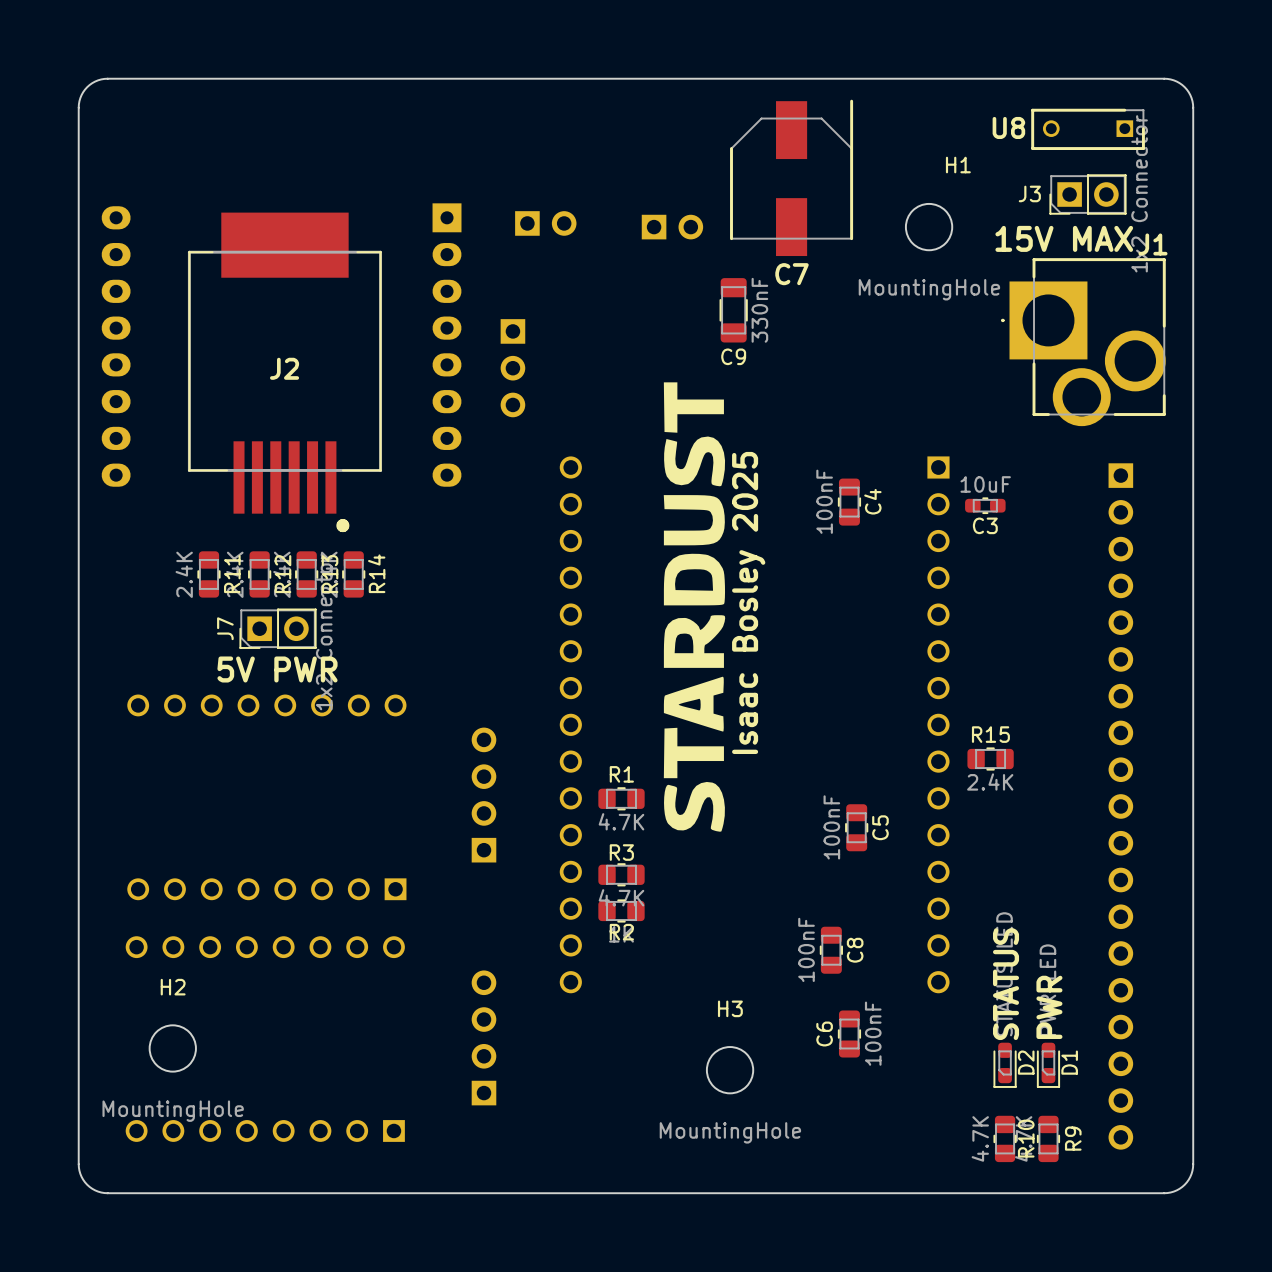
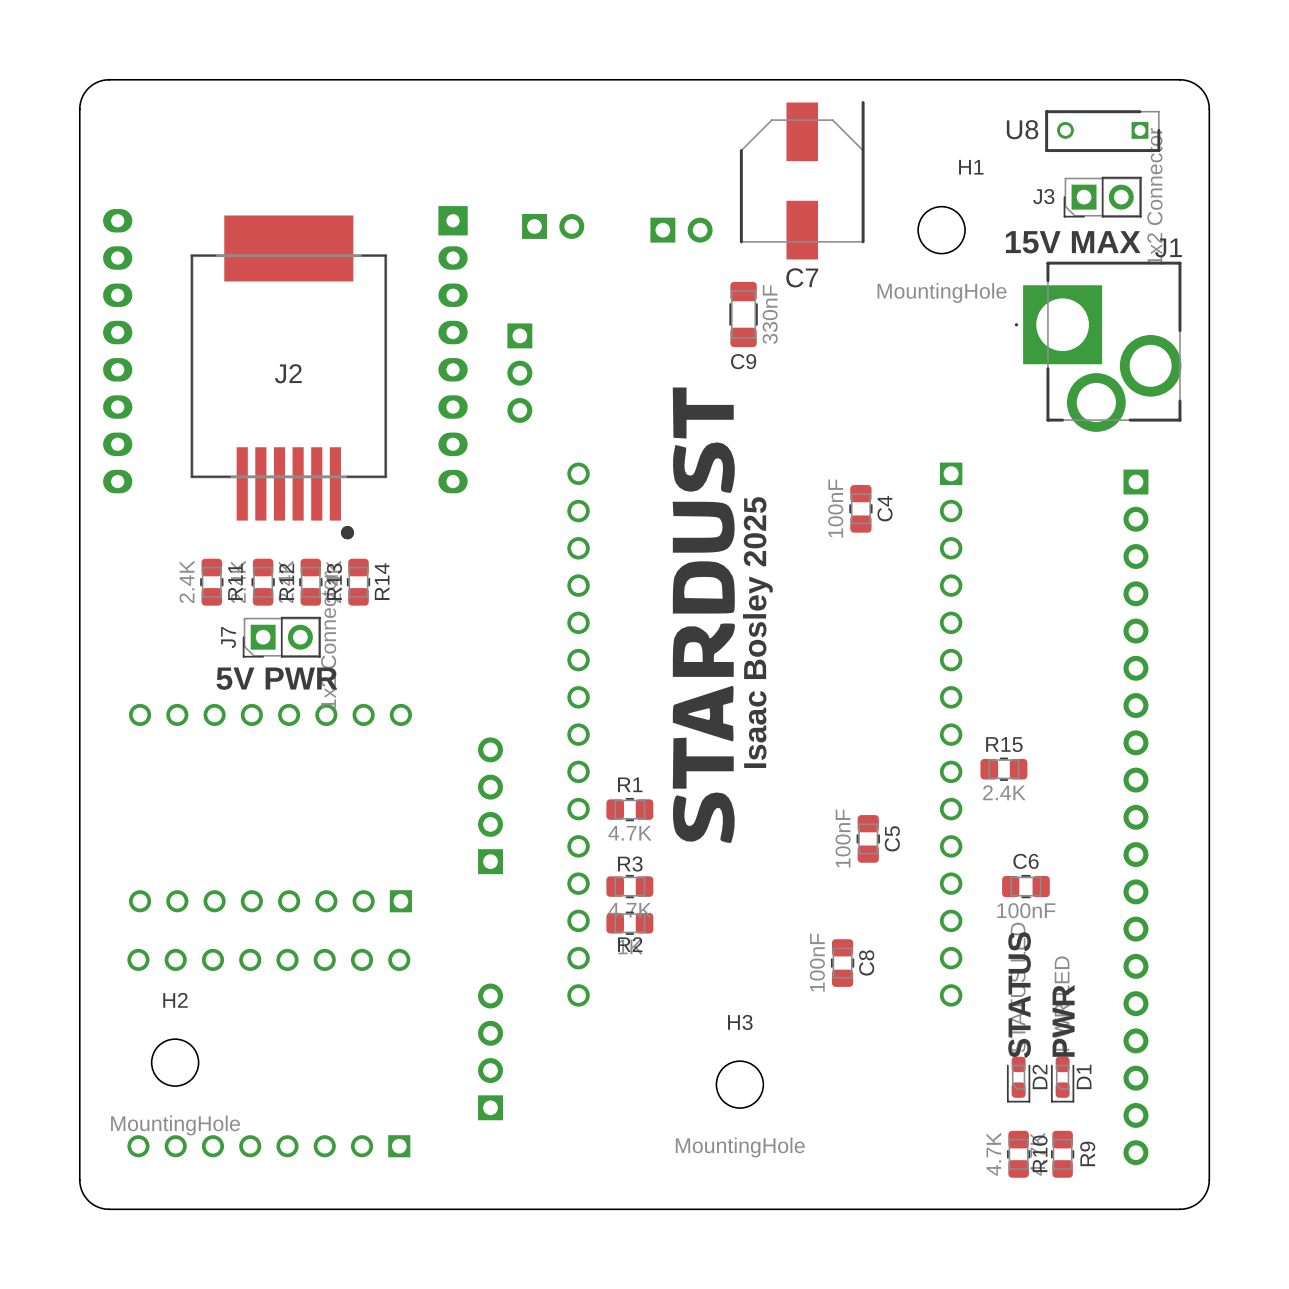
C3: 10uF (985, 505) -> none
C6 rotation: 0° (849, 1034) -> 90° clockwise (1025, 886)
C6 position: (849, 1034) -> (1025, 886)

